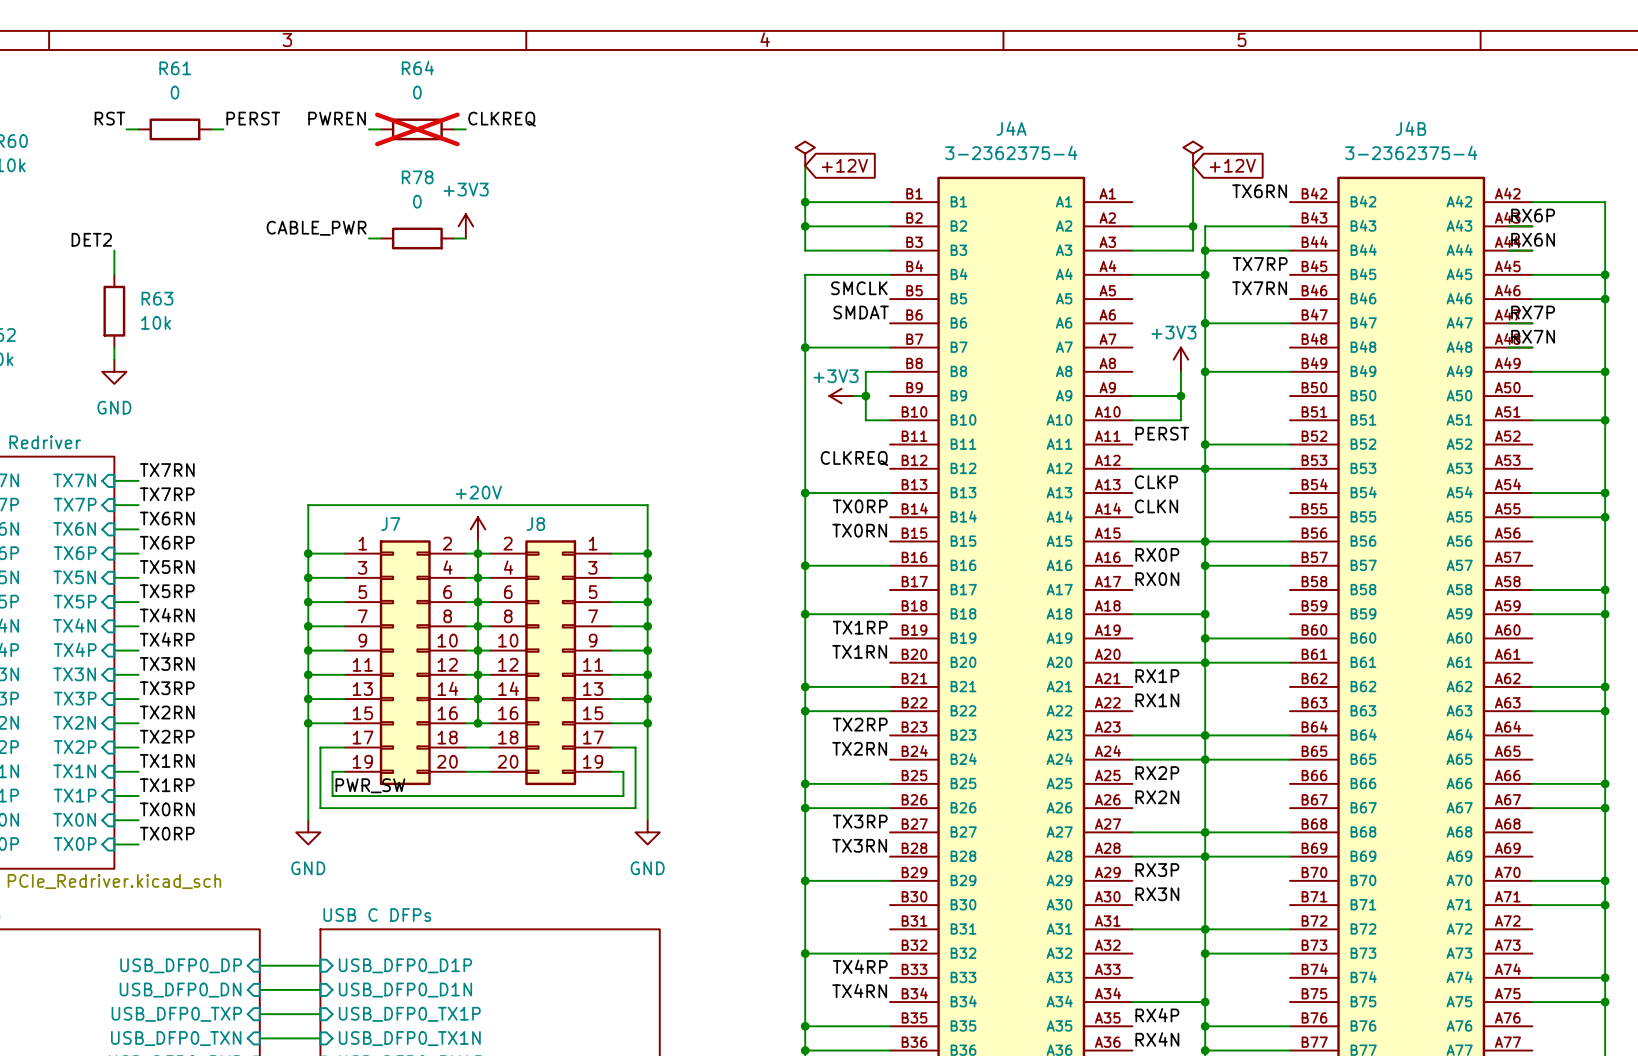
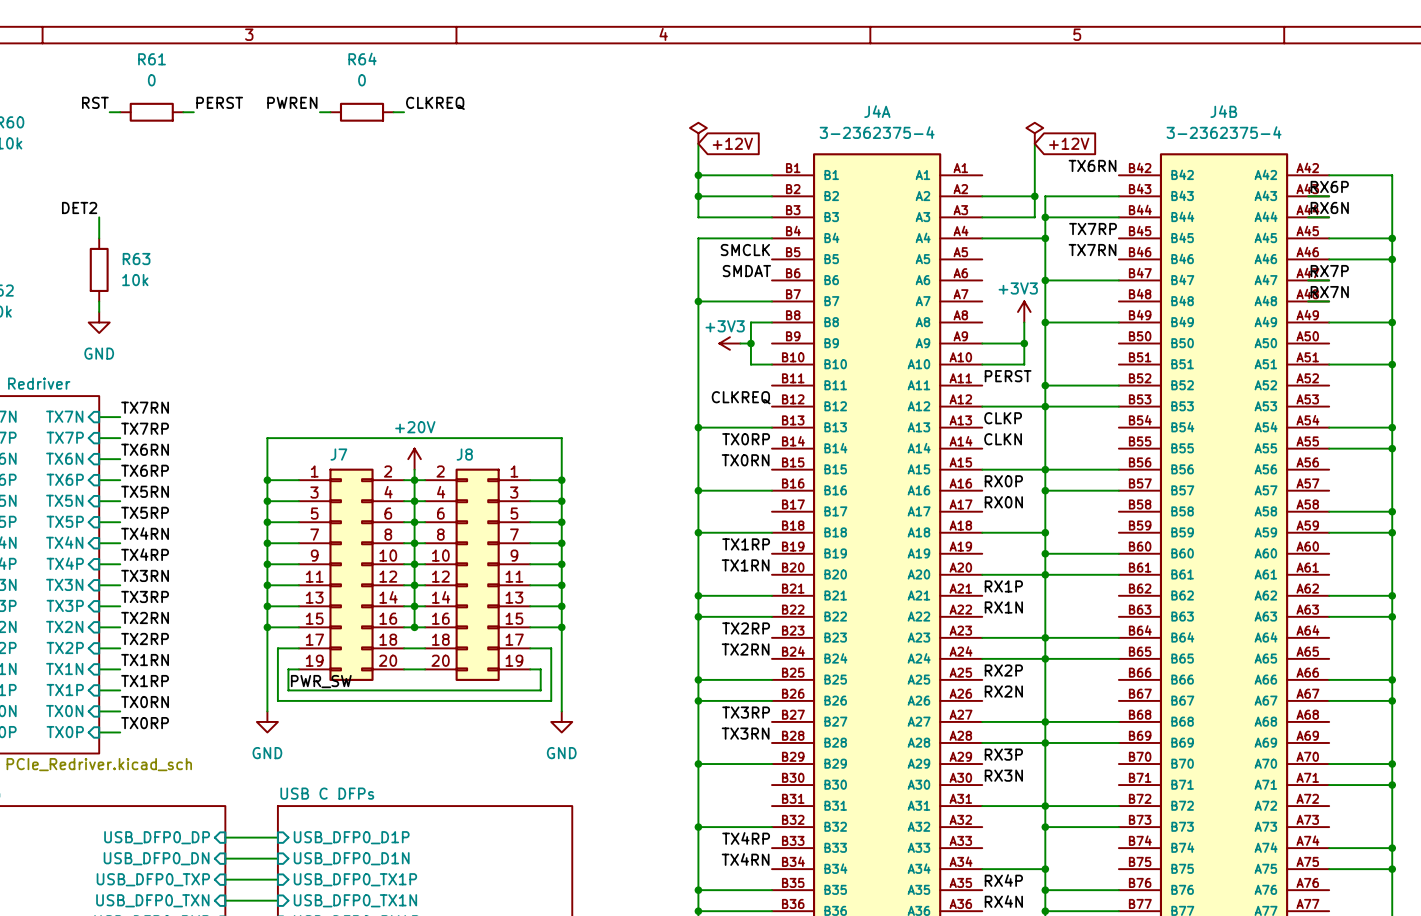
R64 do-not-place cross: (417, 129) -> none
power symbol: +3V3 (465, 226) -> none
label: CABLE_PWR (316, 228) -> none
wire: (368, 238) (381, 238) -> none
R78: 0 (417, 238) -> none
wire: (453, 238) (465, 238) -> none

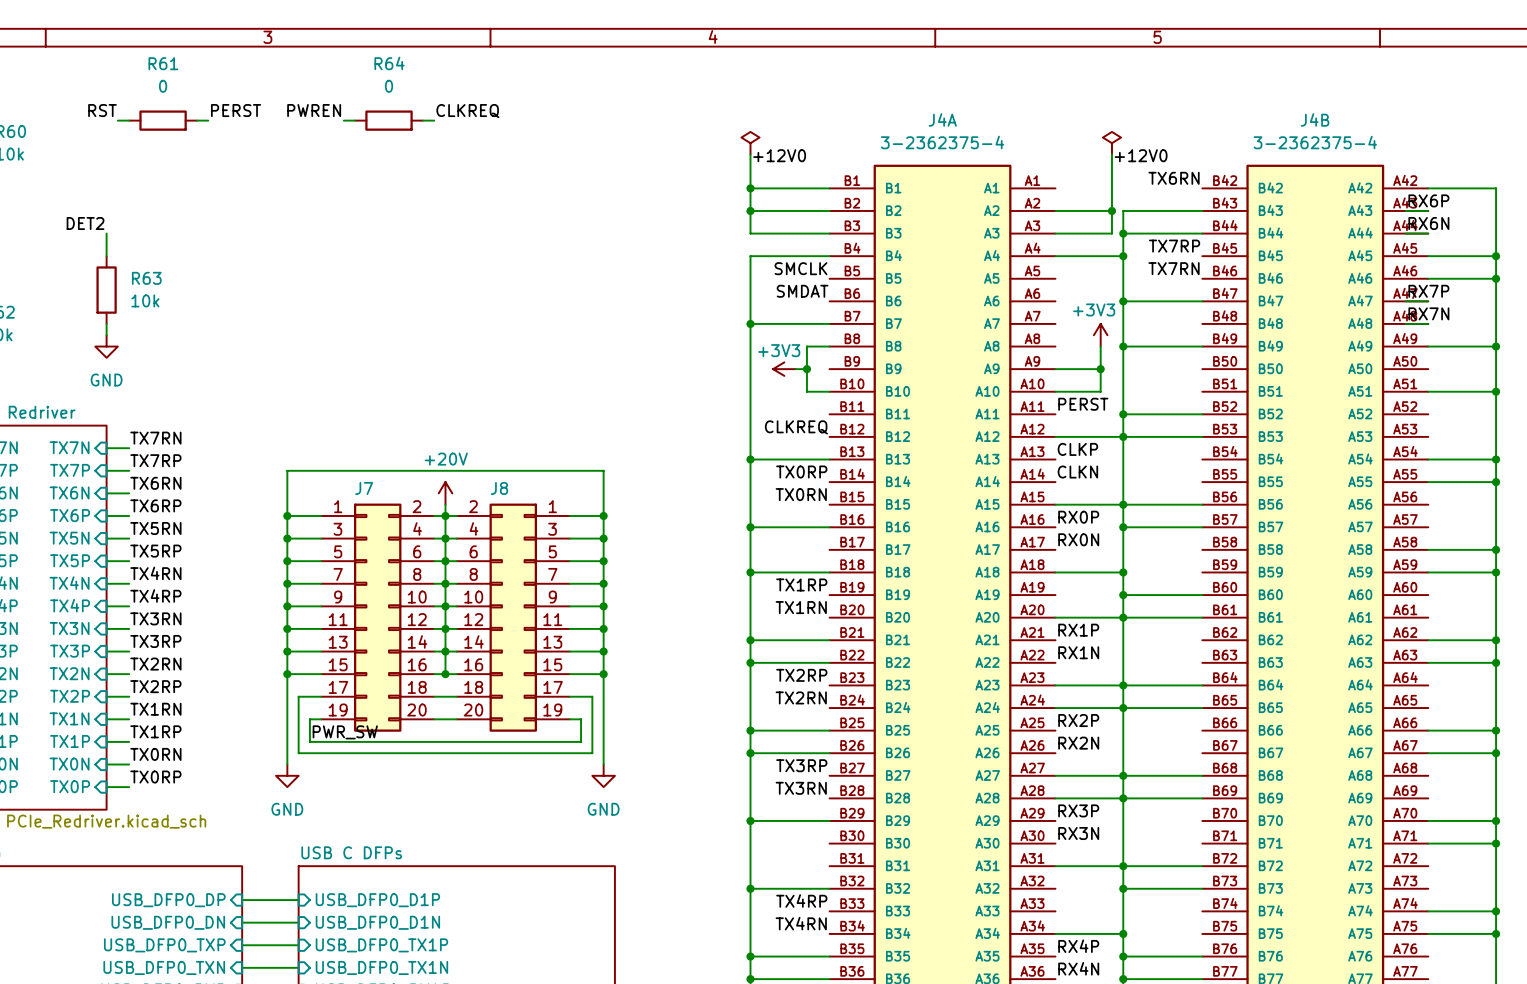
global label: +12V (732, 143) -> none
global label: +12V (1069, 143) -> none
label: none -> +12V0 (779, 155)
label: none -> +12V0 (1141, 155)

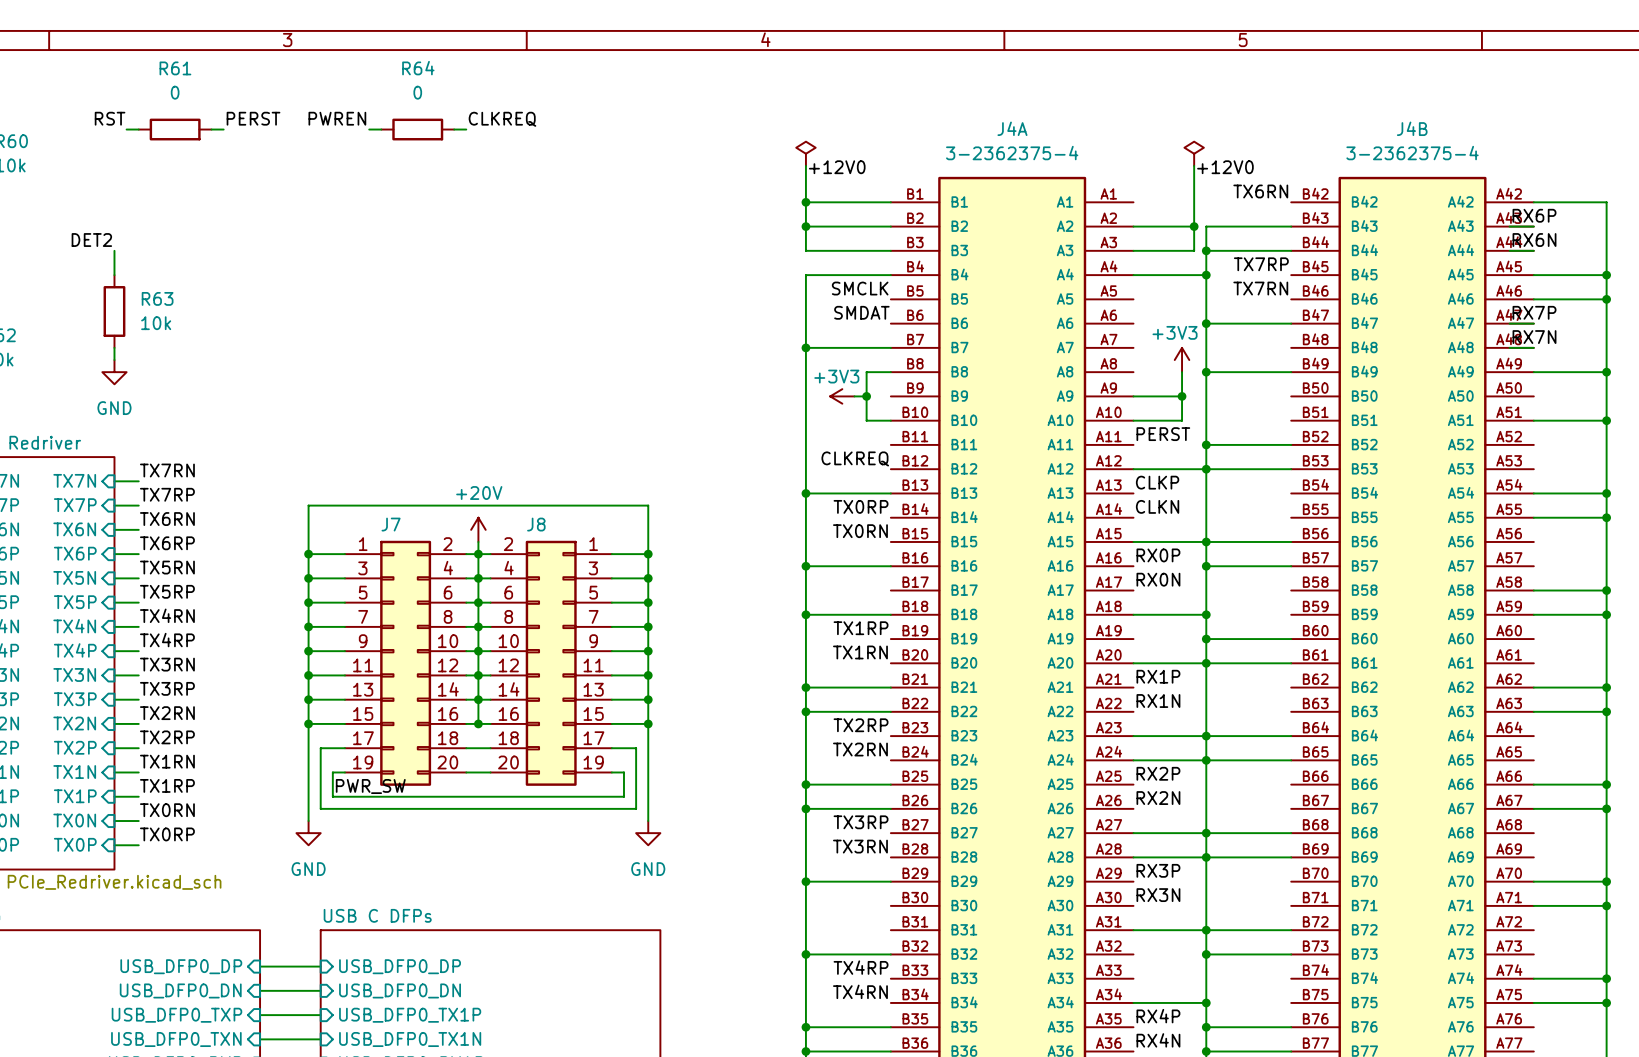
sheet pin: USB_DFP0_D1P (377, 900) -> USB_DFP0_DP (400, 966)
sheet pin: USB_DFP0_D1N (377, 922) -> USB_DFP0_DN (400, 990)

